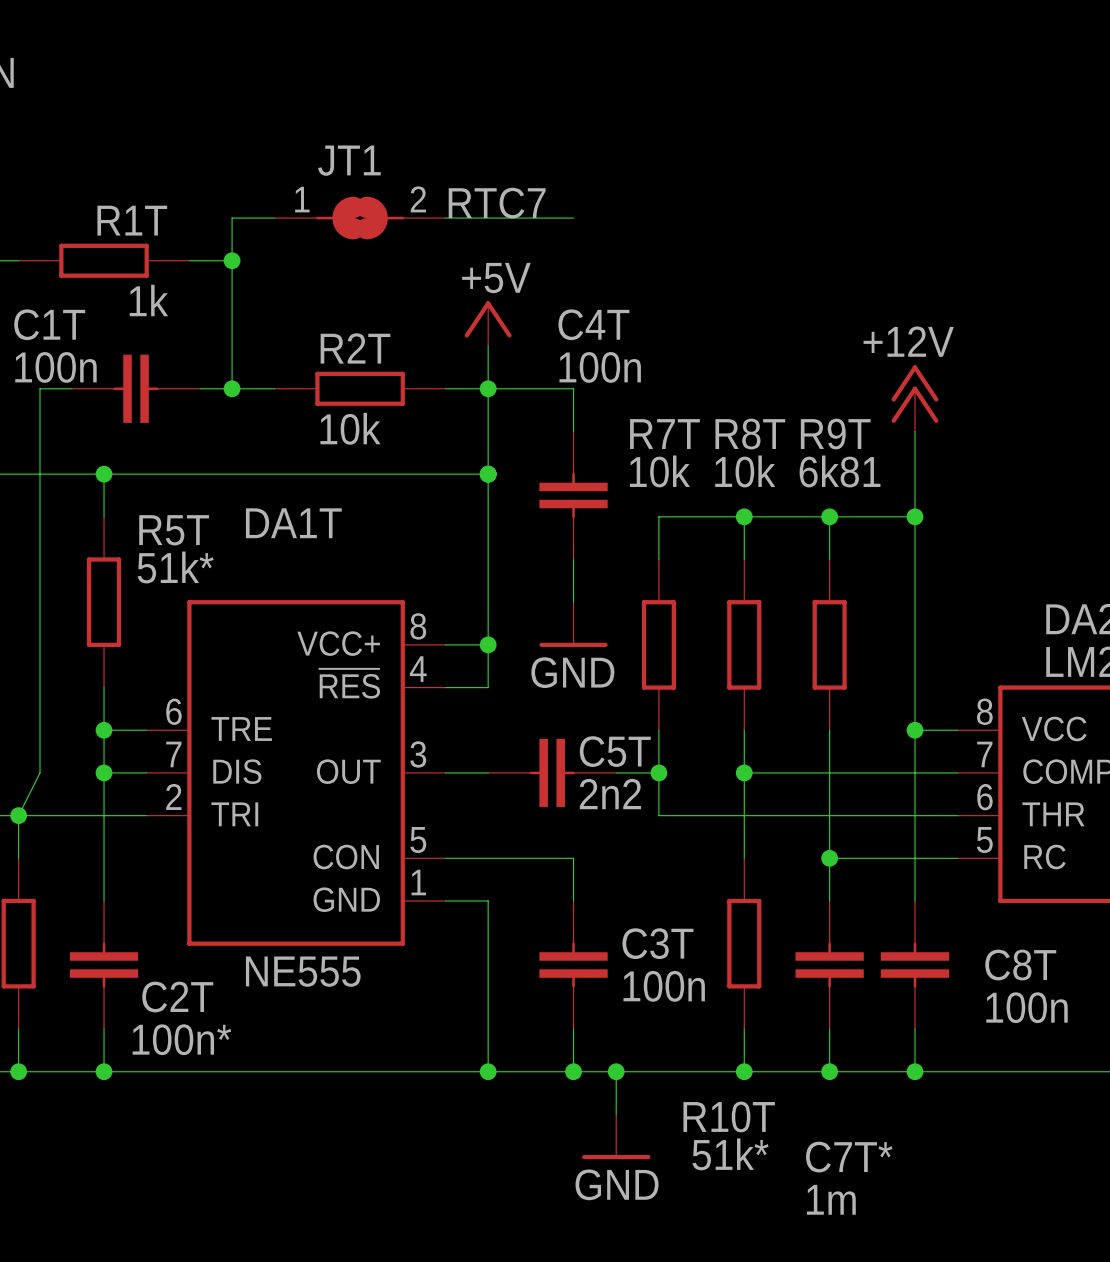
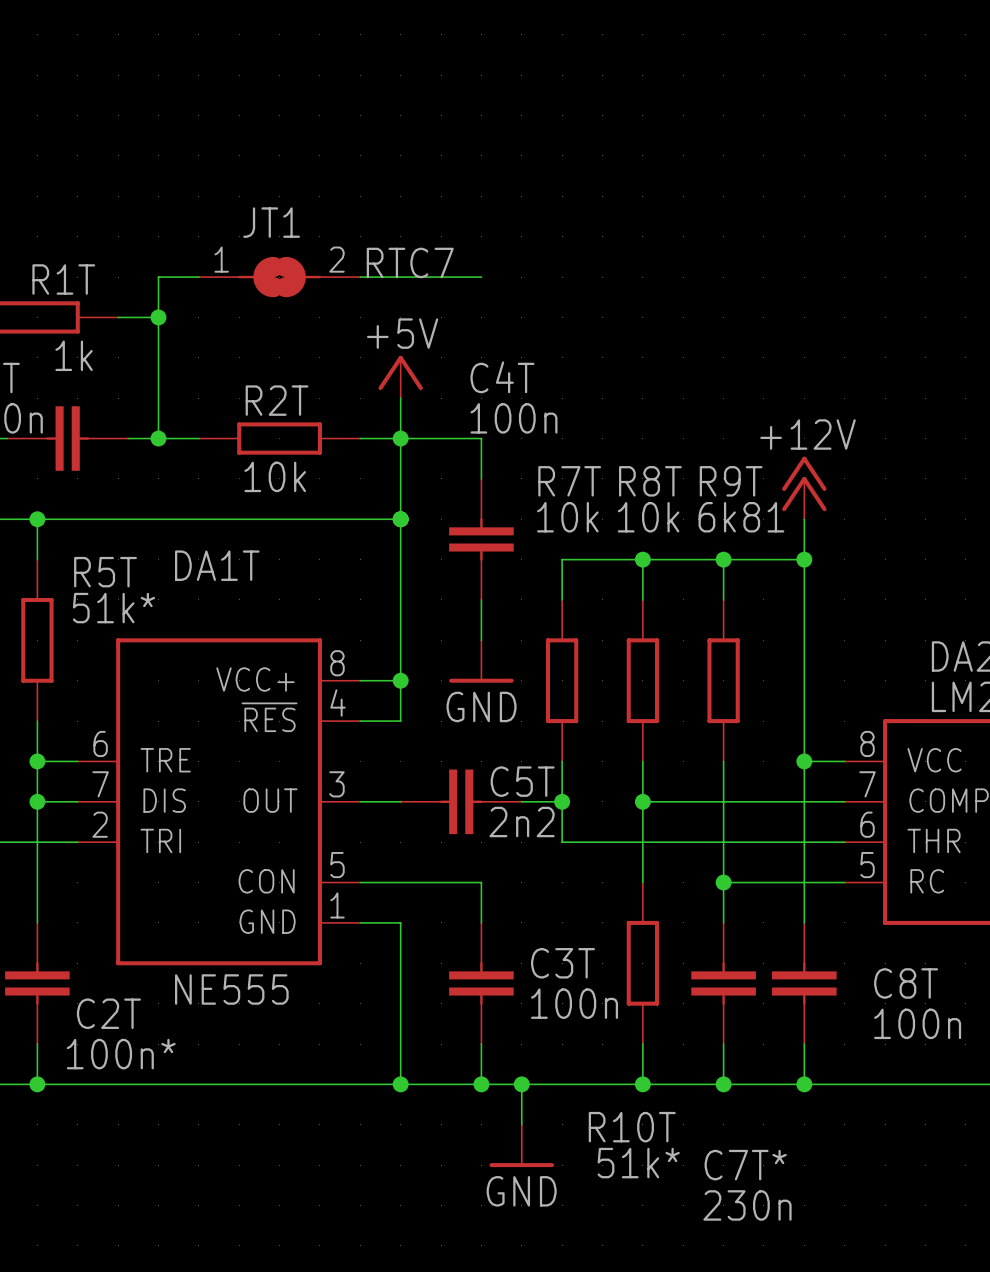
power symbol position: +12V (915, 398) -> +12V (804, 487)
C7T* value: 1m (831, 1199) -> 230n (747, 1205)

